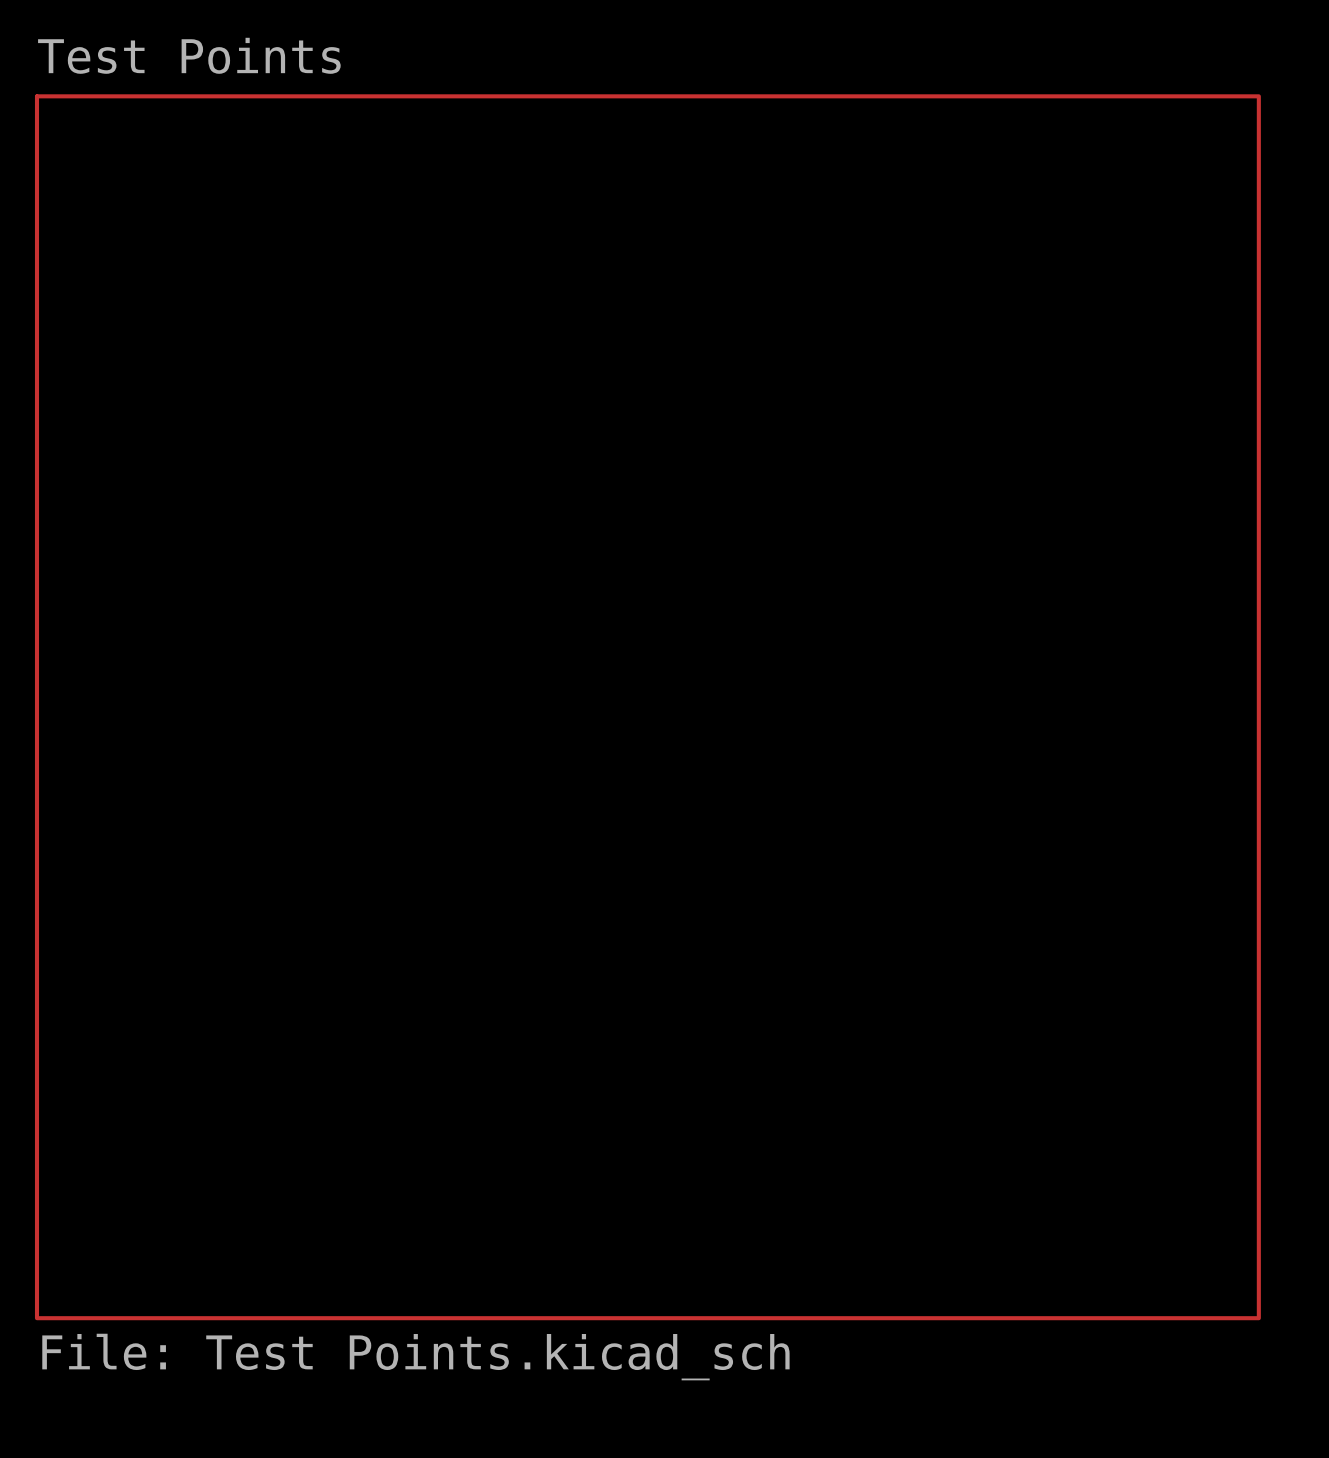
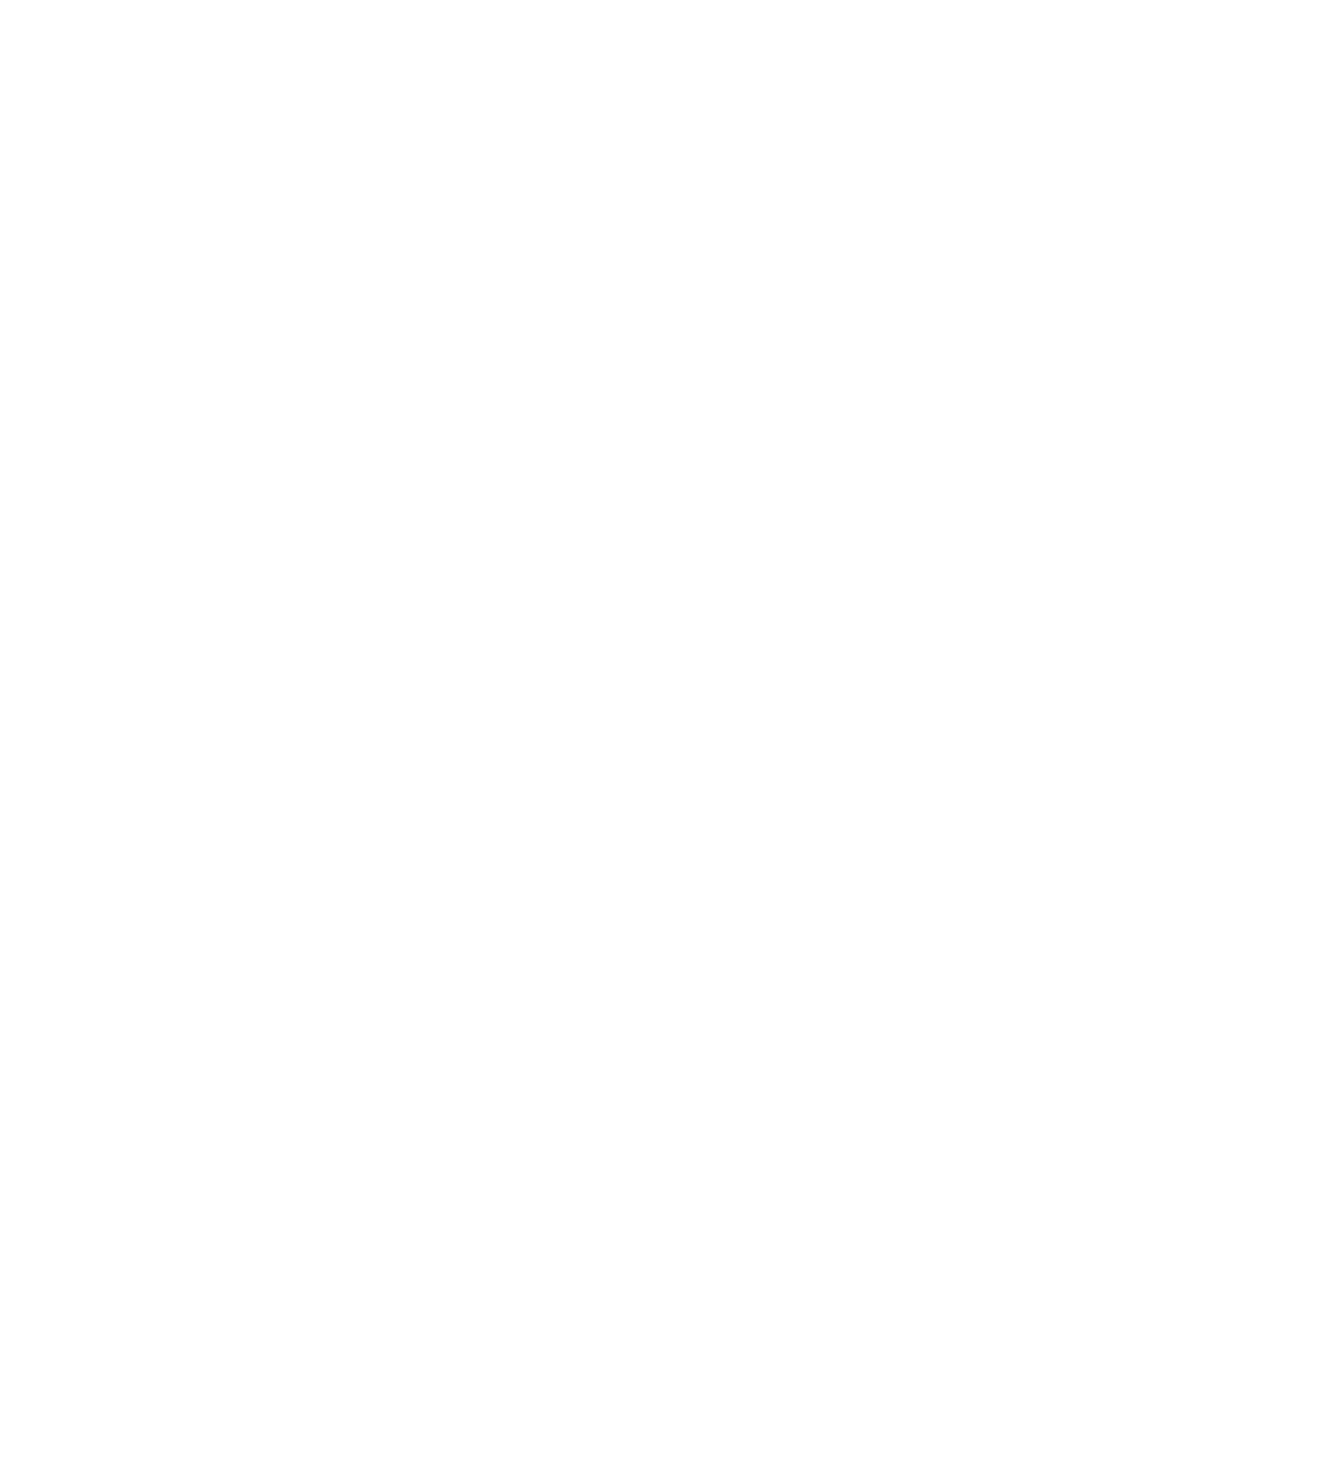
sheet Test Points: File: Test Points.kicad_sch (647, 707) -> none

